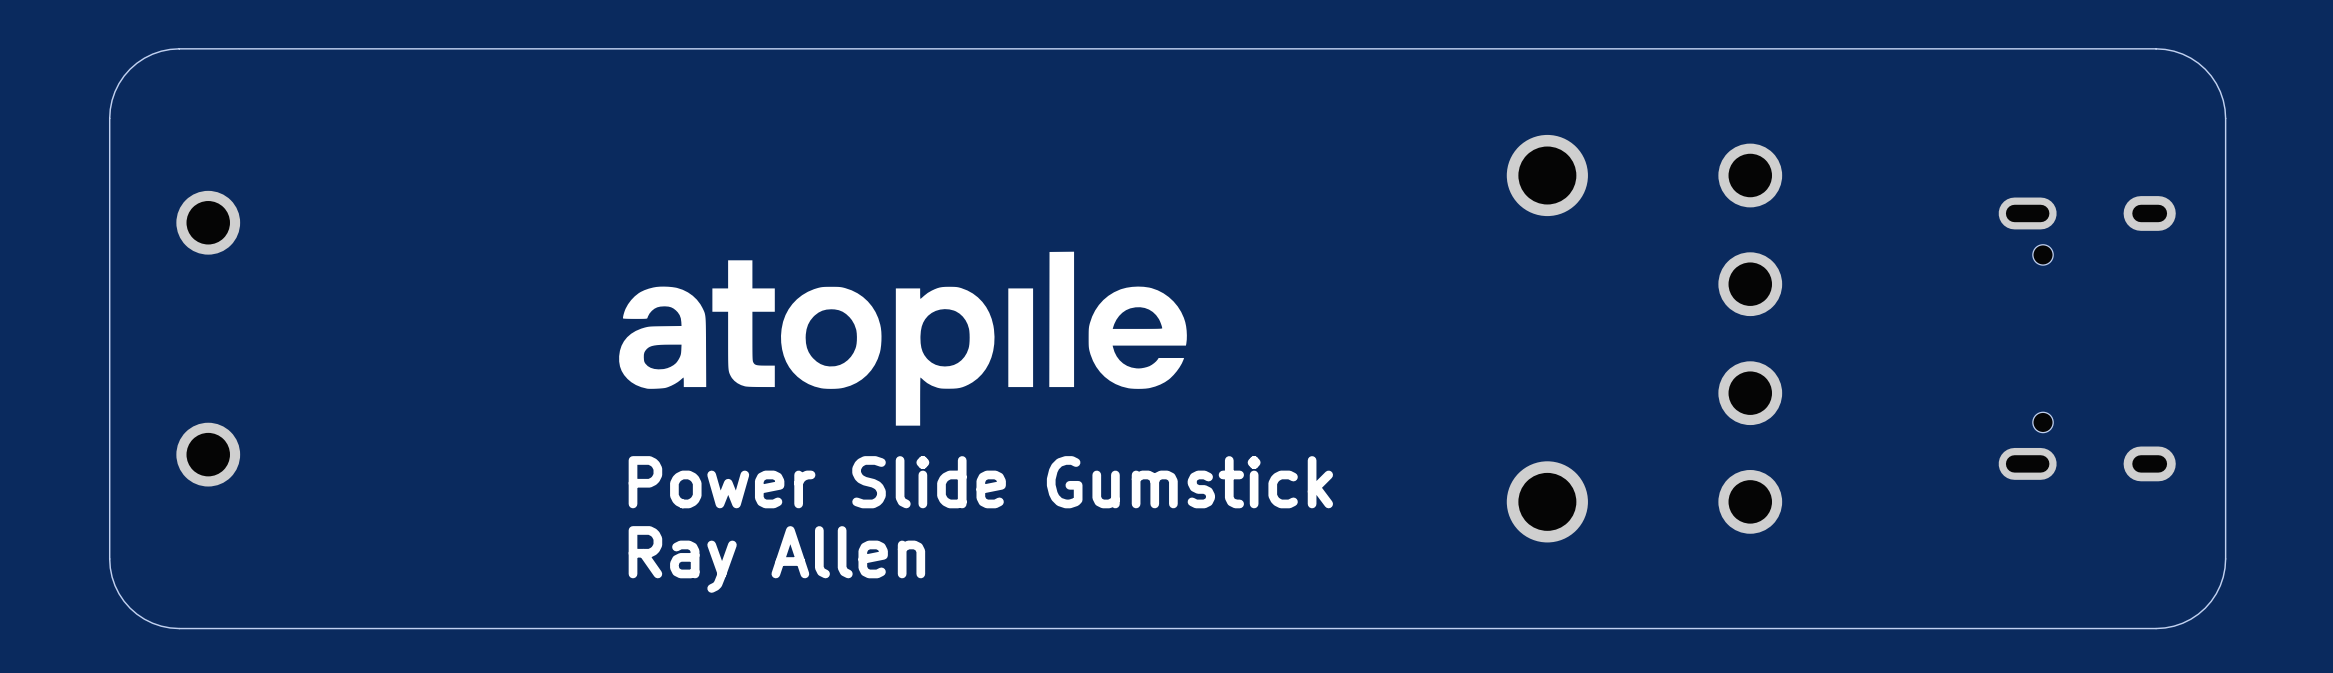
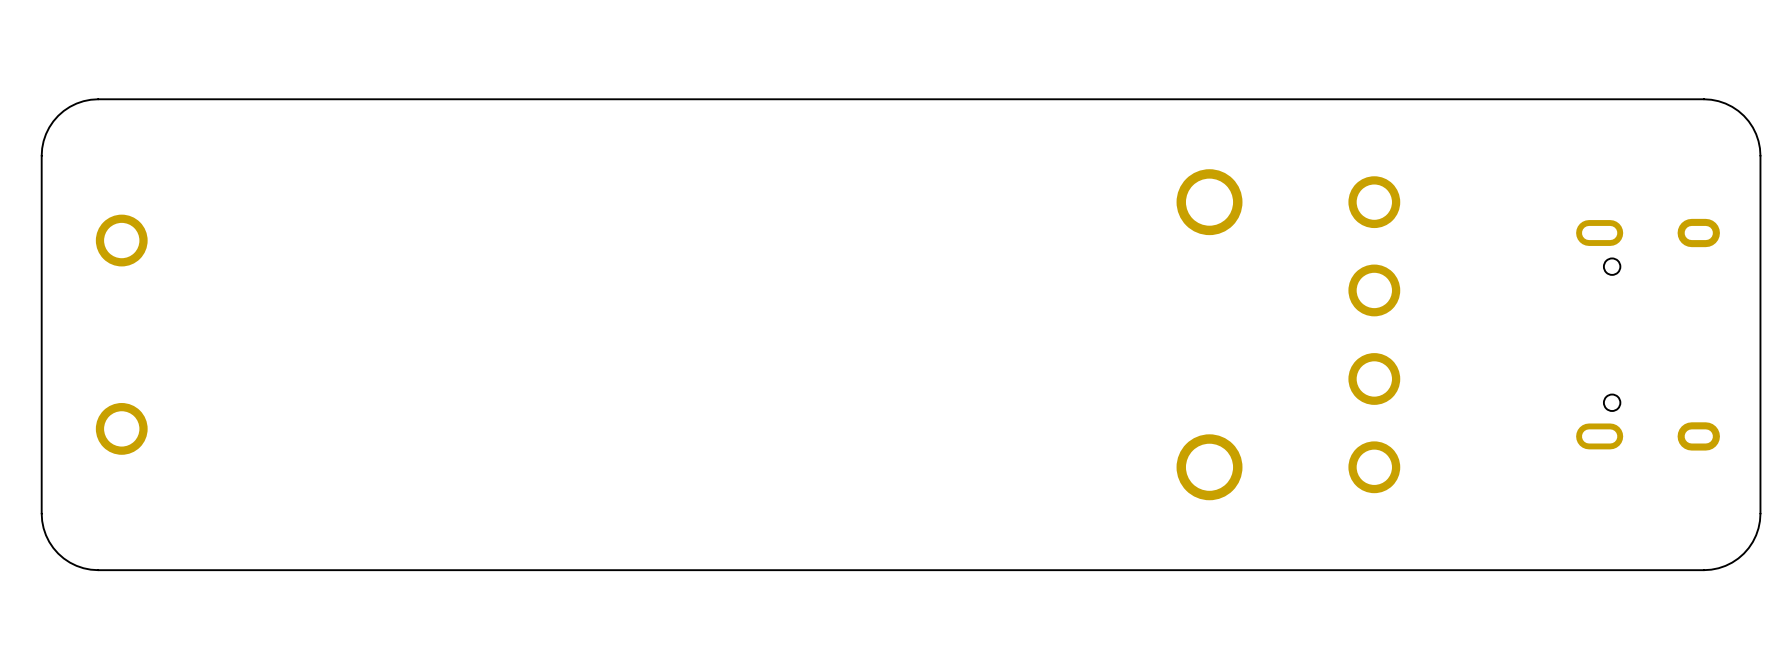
drawing: [619, 251, 1187, 426] -> none
text: Power Slide Gumstick (980, 482) -> none
text: Ray Allen (776, 559) -> none

